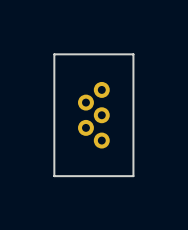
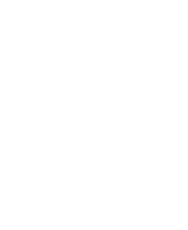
part: (93, 115) -> none

